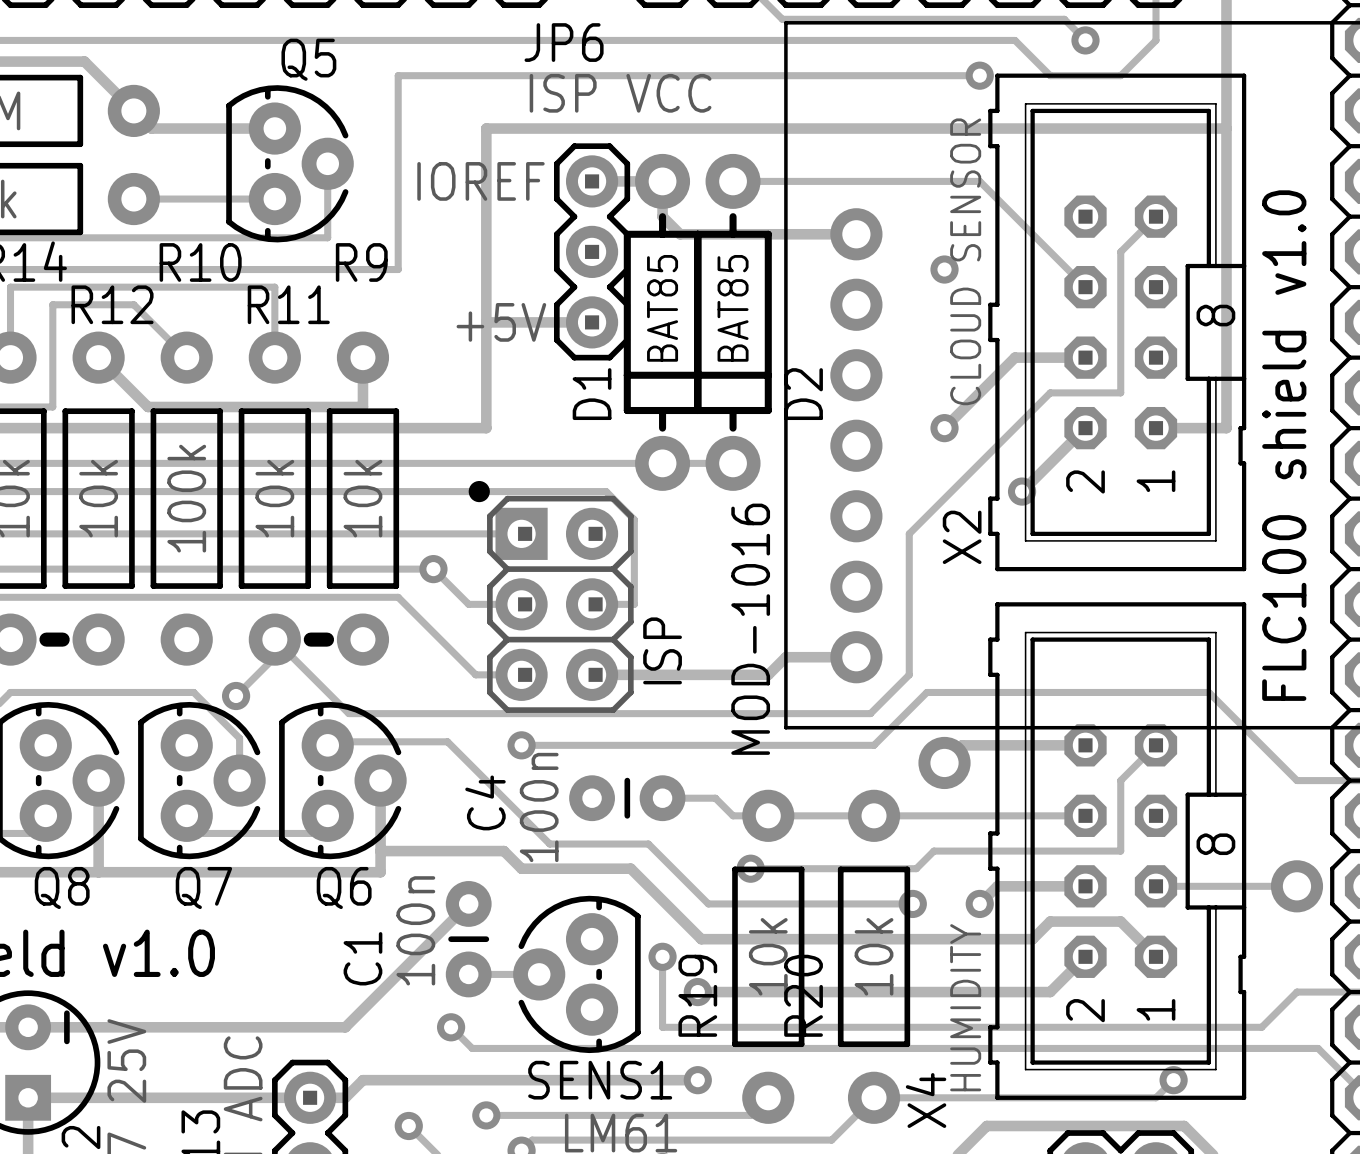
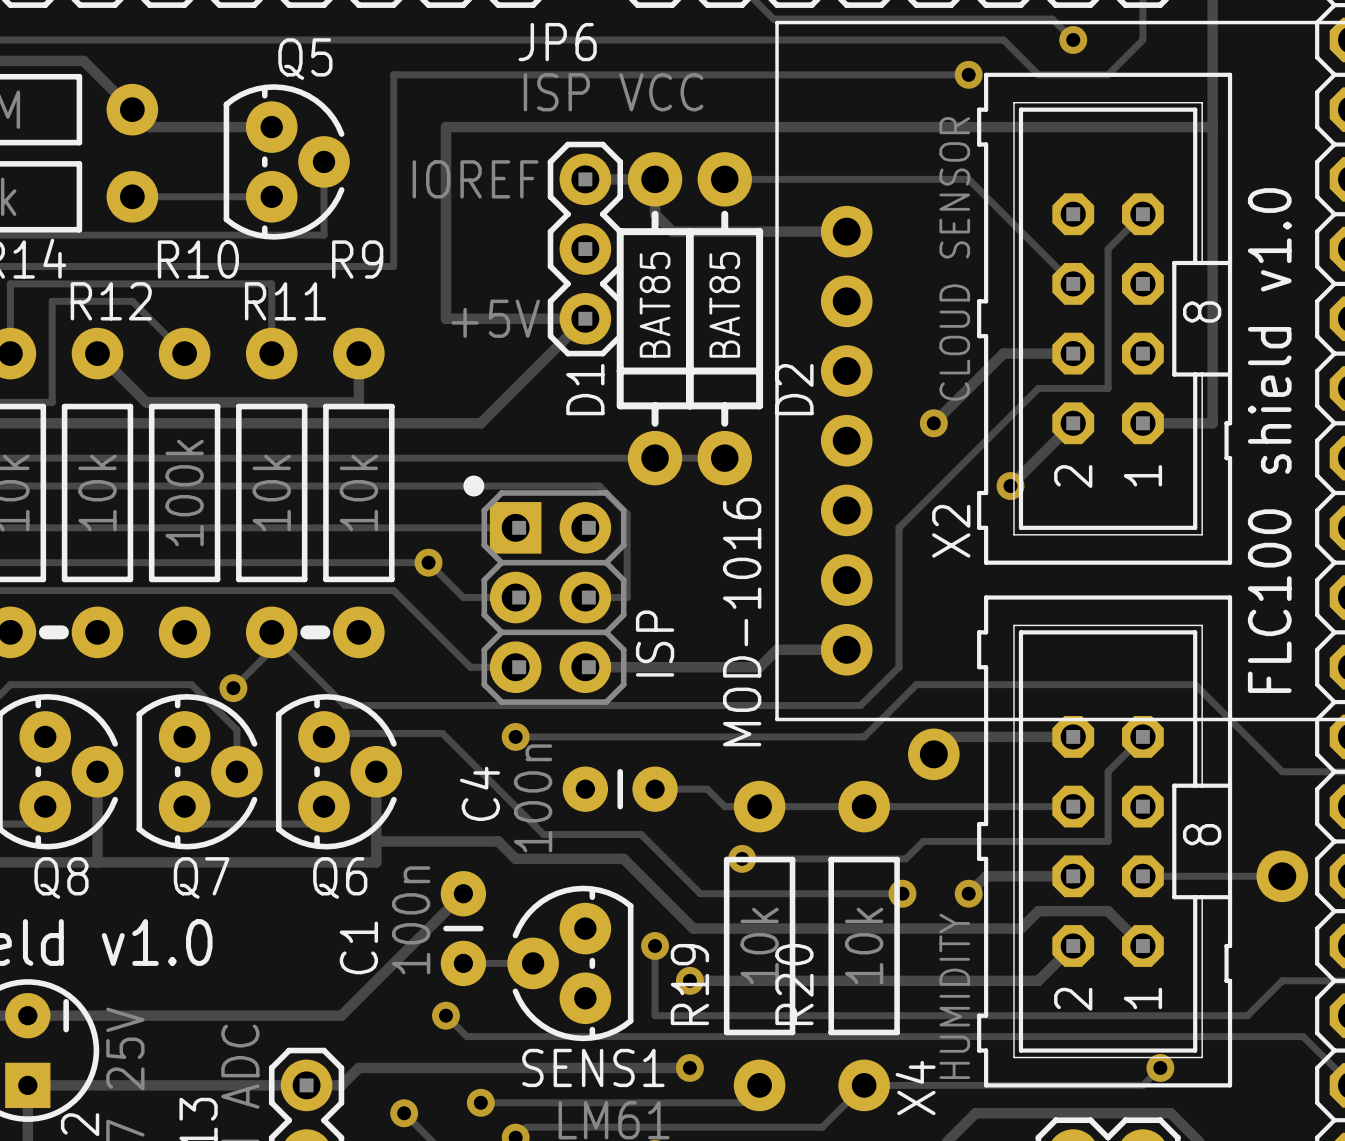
track: (486, 128) (486, 428) -> (480, 127) (445, 127) (445, 318) (480, 318)
via: (944, 269) -> none
track: none -> (585, 318) (480, 423)

